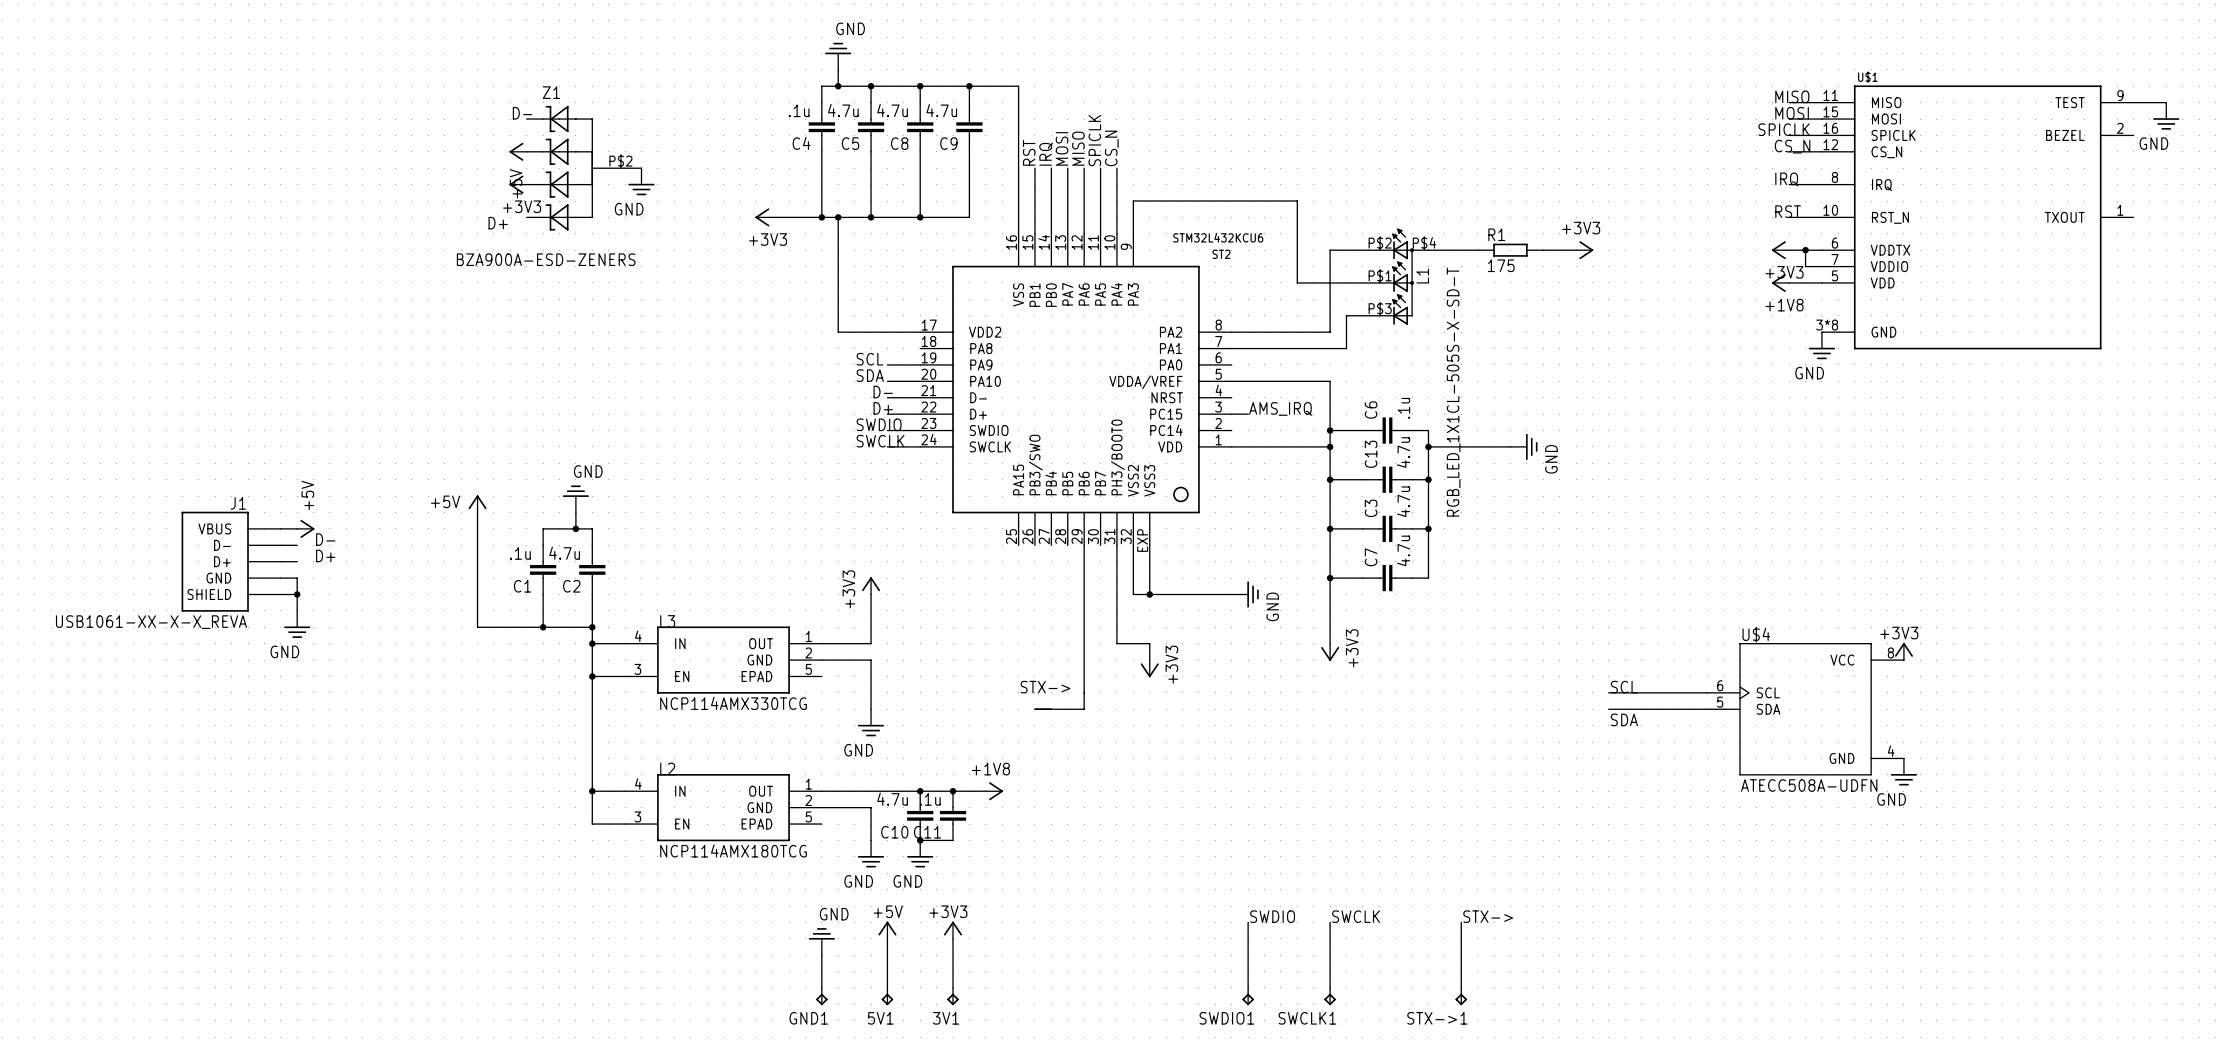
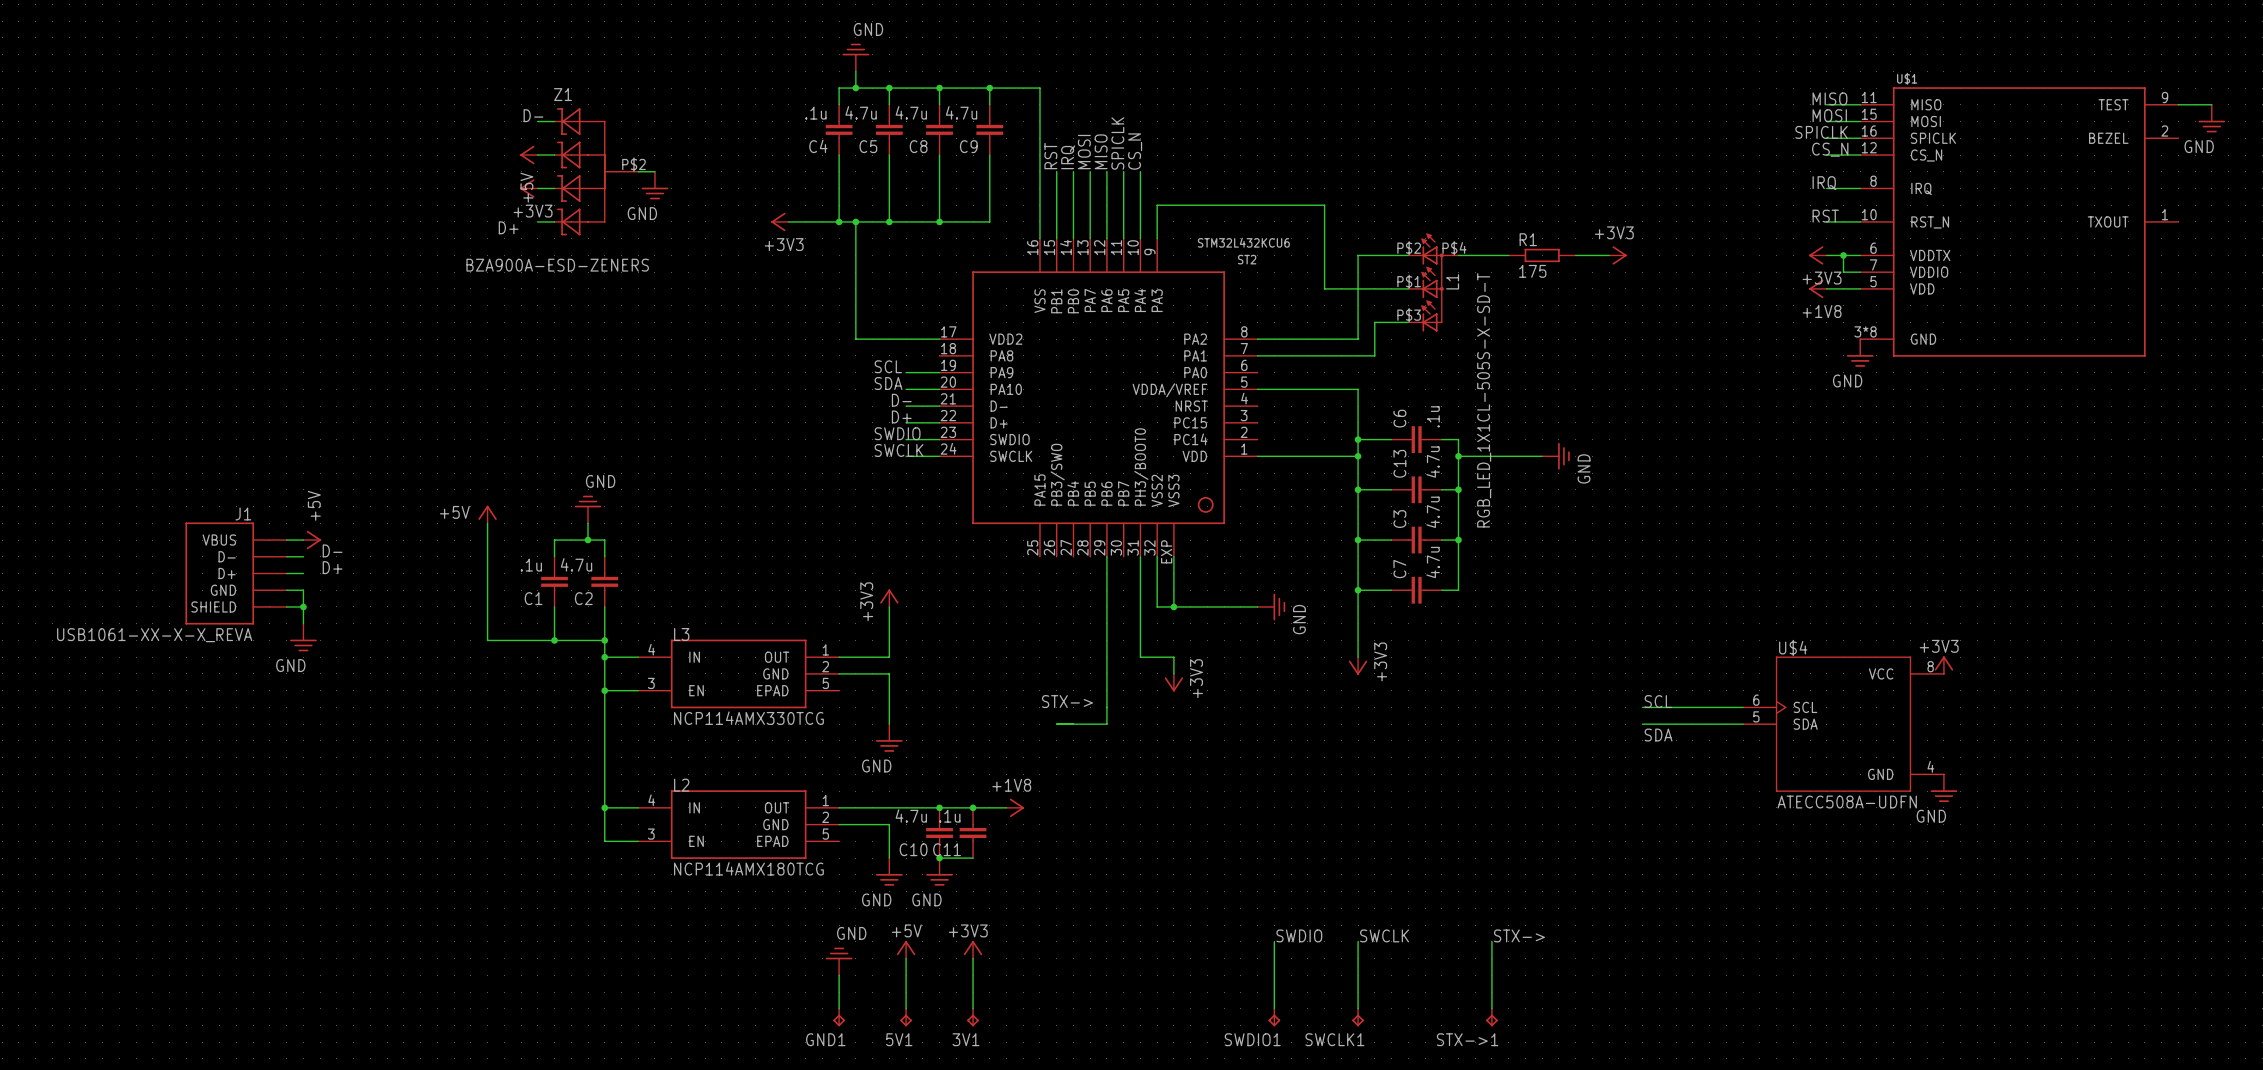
label: AMS_IRQ (1280, 408) -> none
wire: (1231, 414) (1248, 414) -> none

